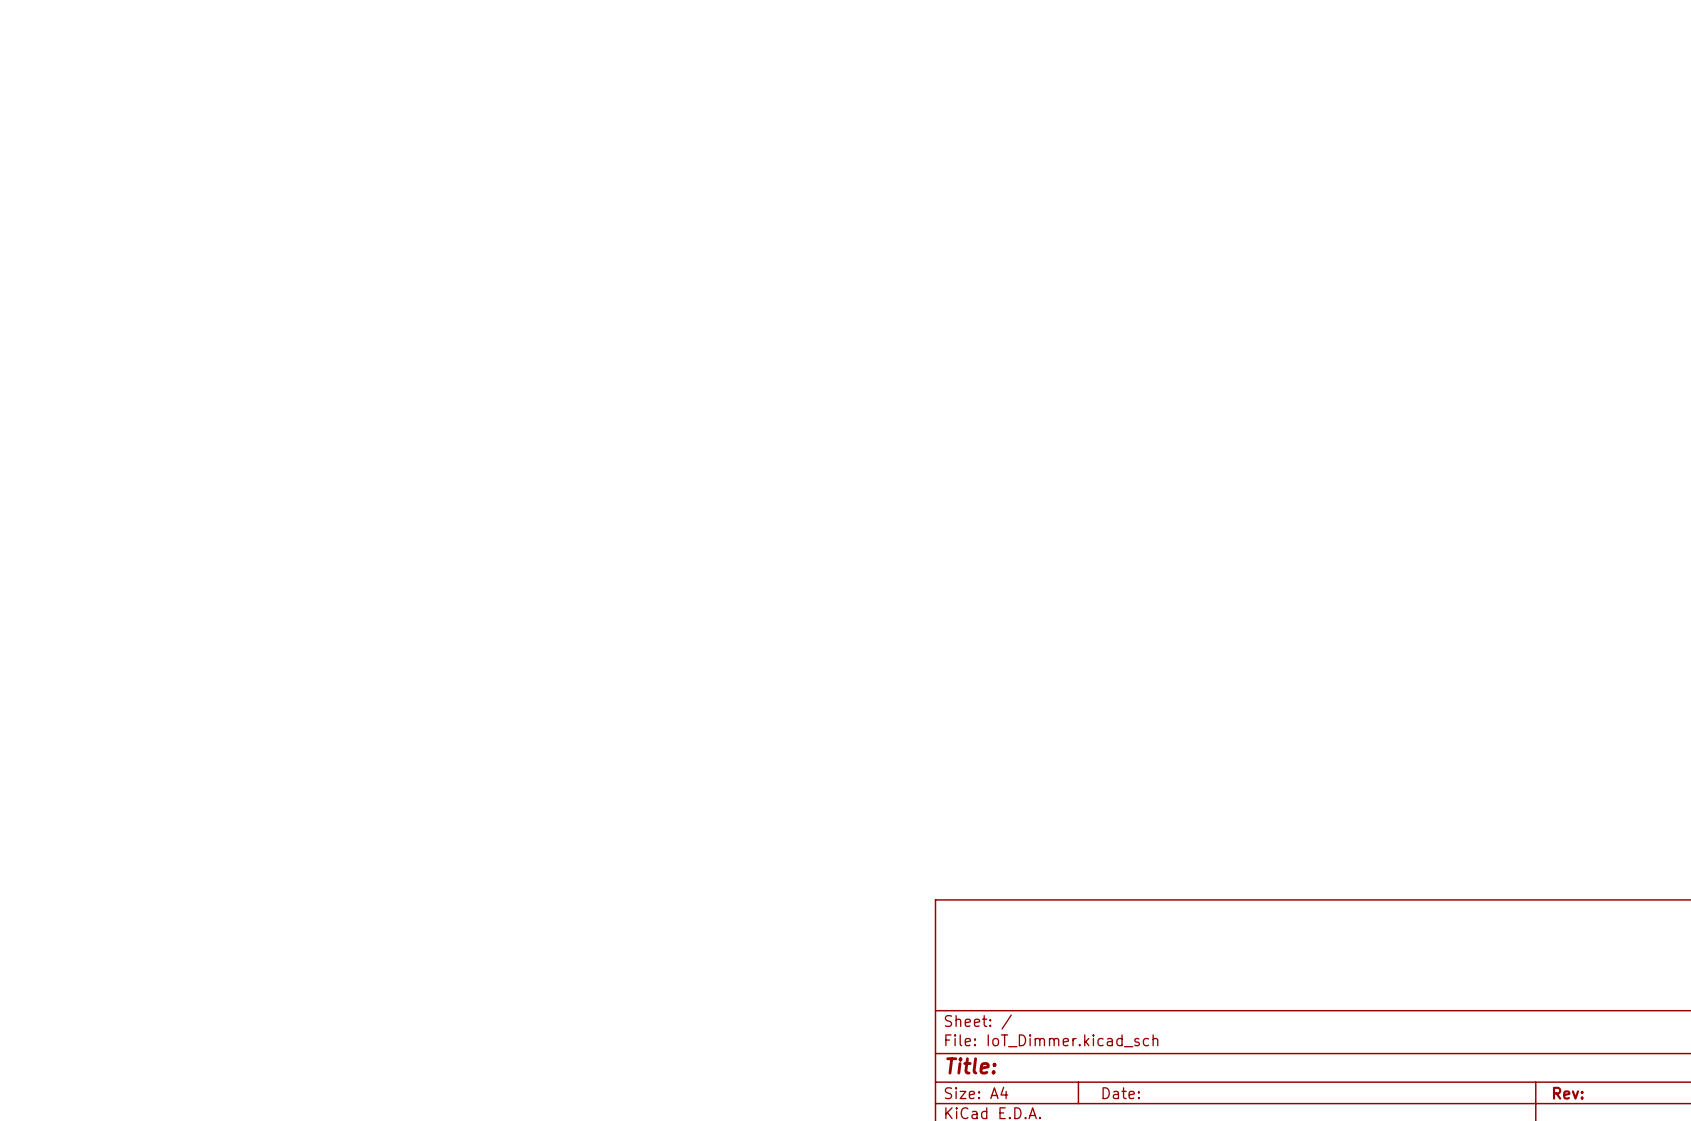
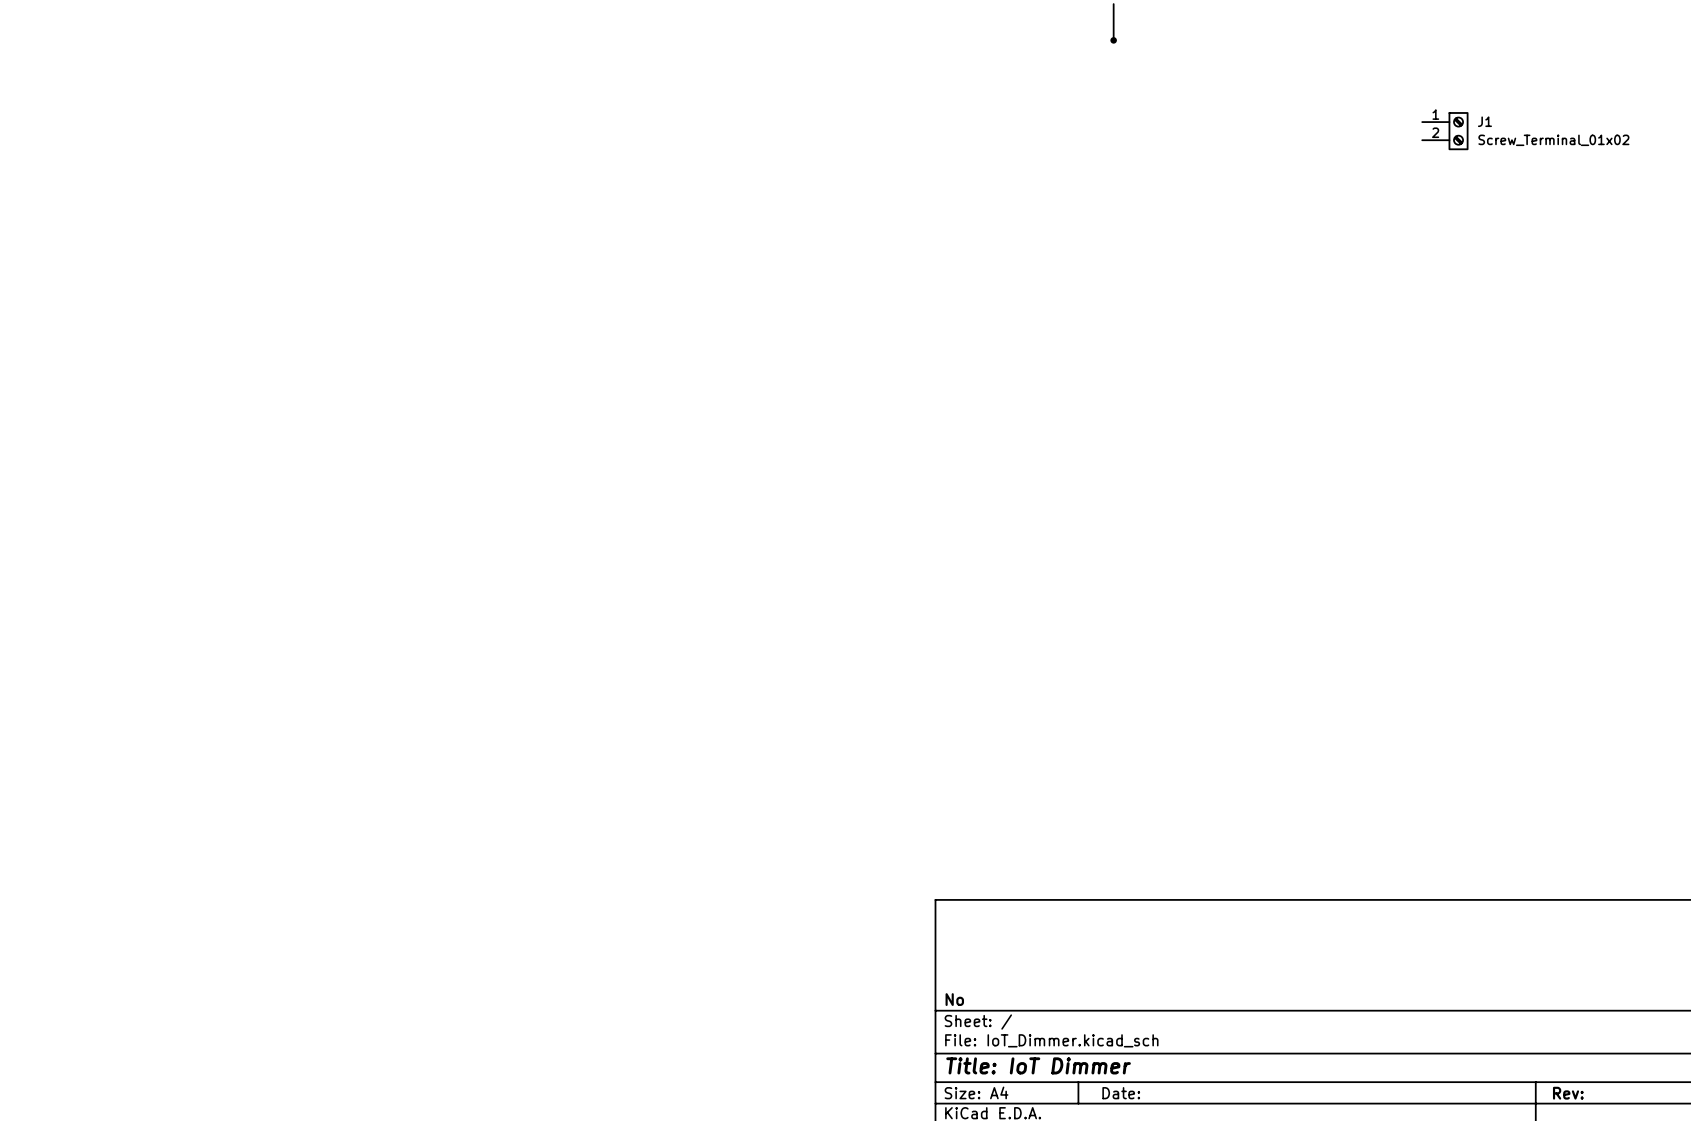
wire: none -> (1113, 4) (1113, 40)
junction: none -> (1113, 40)
J1: none -> Screw_Terminal_01x02 (1445, 131)
title block: none -> No (954, 999)
title block: Title: (971, 1065) -> Title: IoT Dimmer (1038, 1065)

